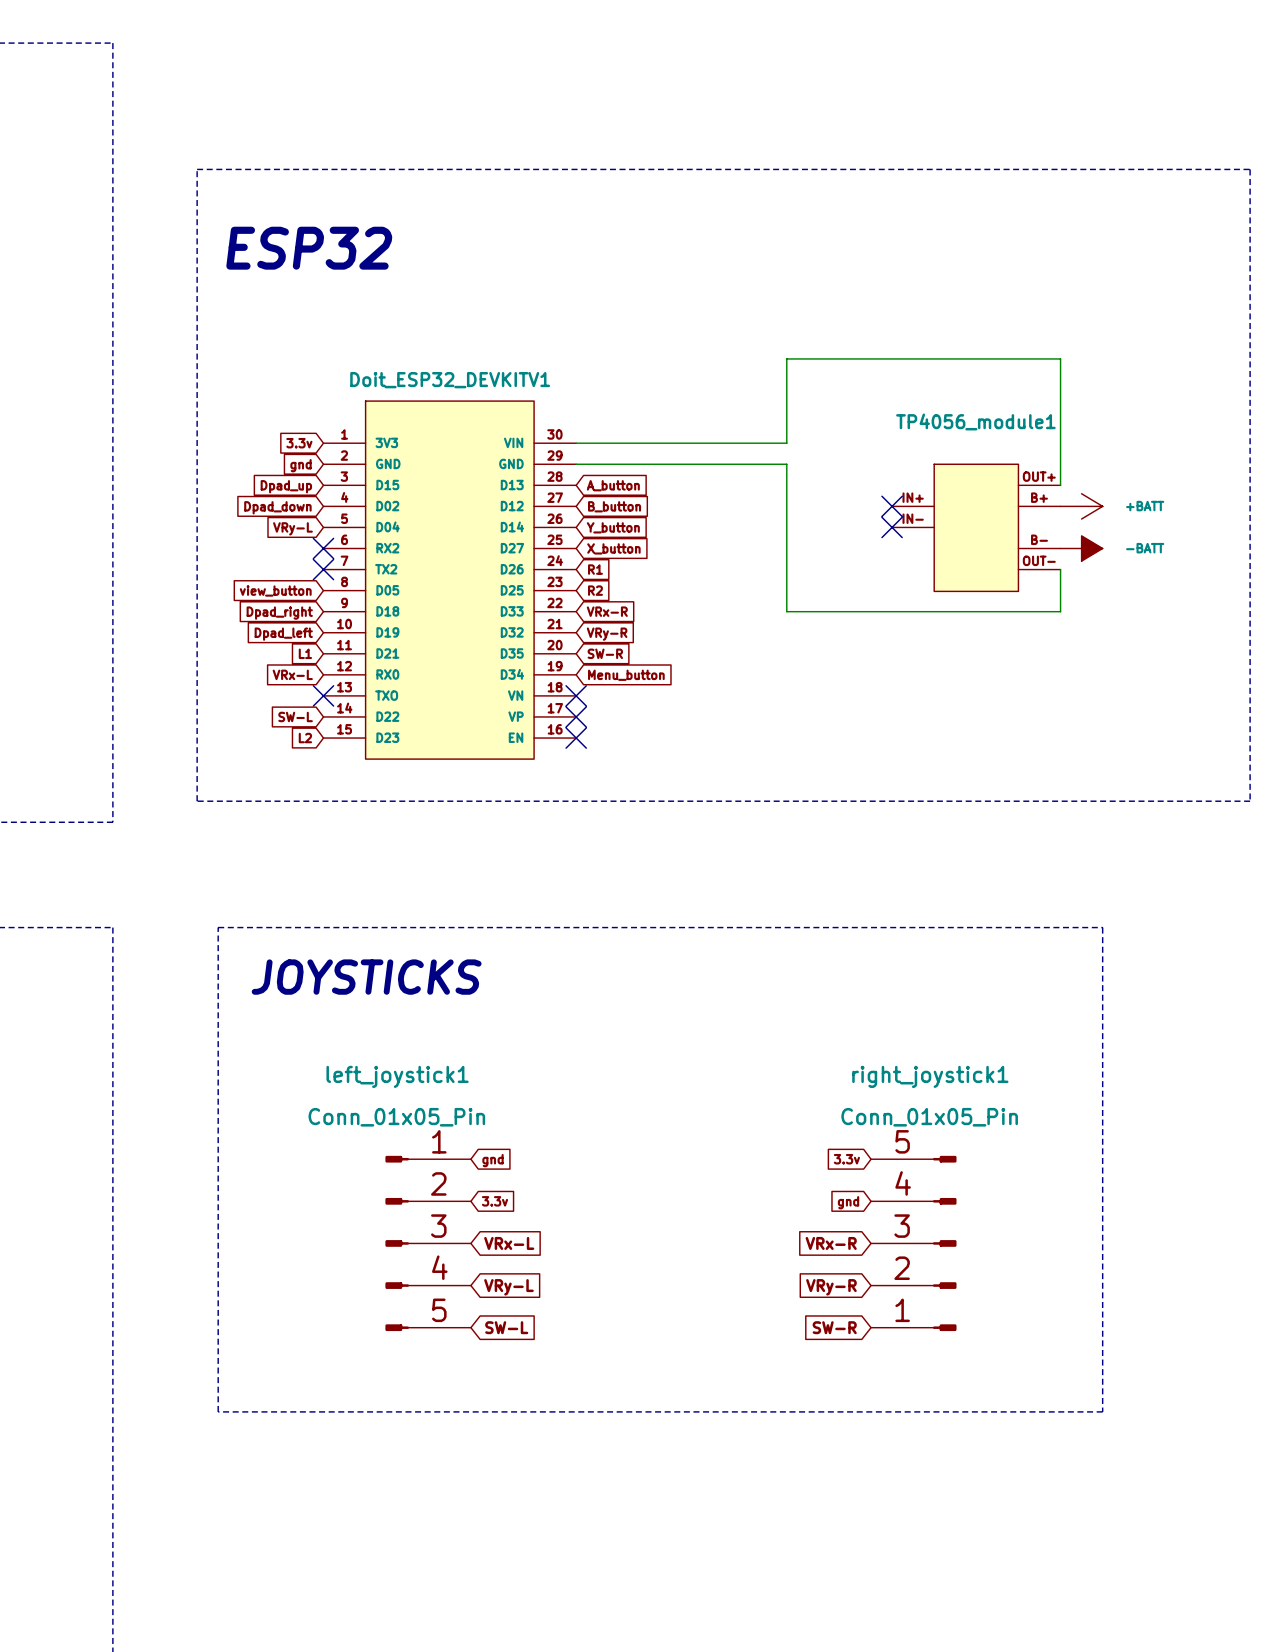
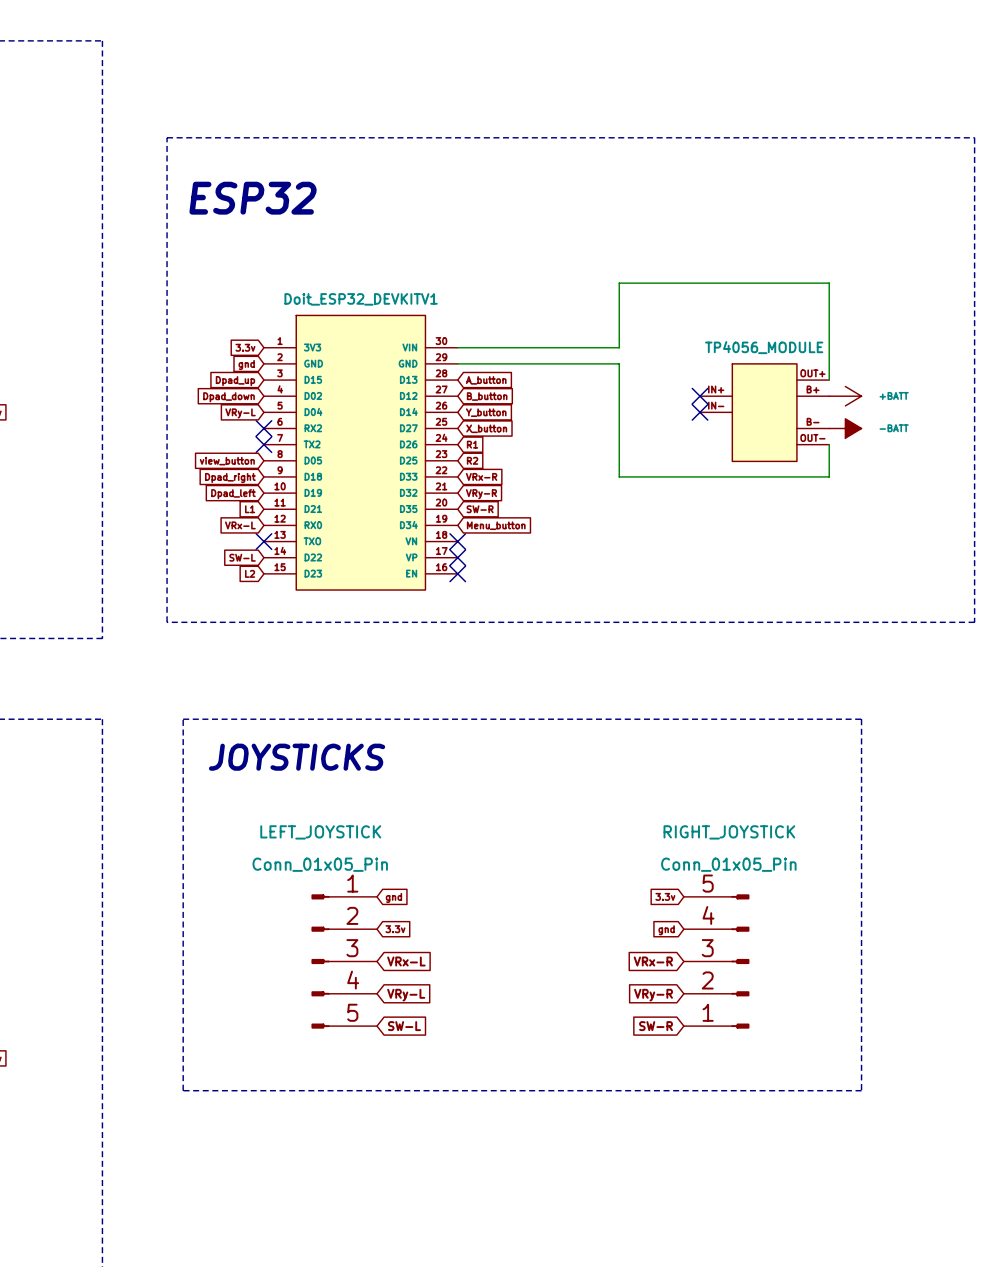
TP4056_module1 name: TP4056_module1 (975, 421) -> TP4056_MODULE (764, 347)
left_joystick1 name: left_joystick1 (397, 1076) -> LEFT_JOYSTICK (320, 832)
right_joystick1 name: right_joystick1 (930, 1076) -> RIGHT_JOYSTICK (729, 832)

